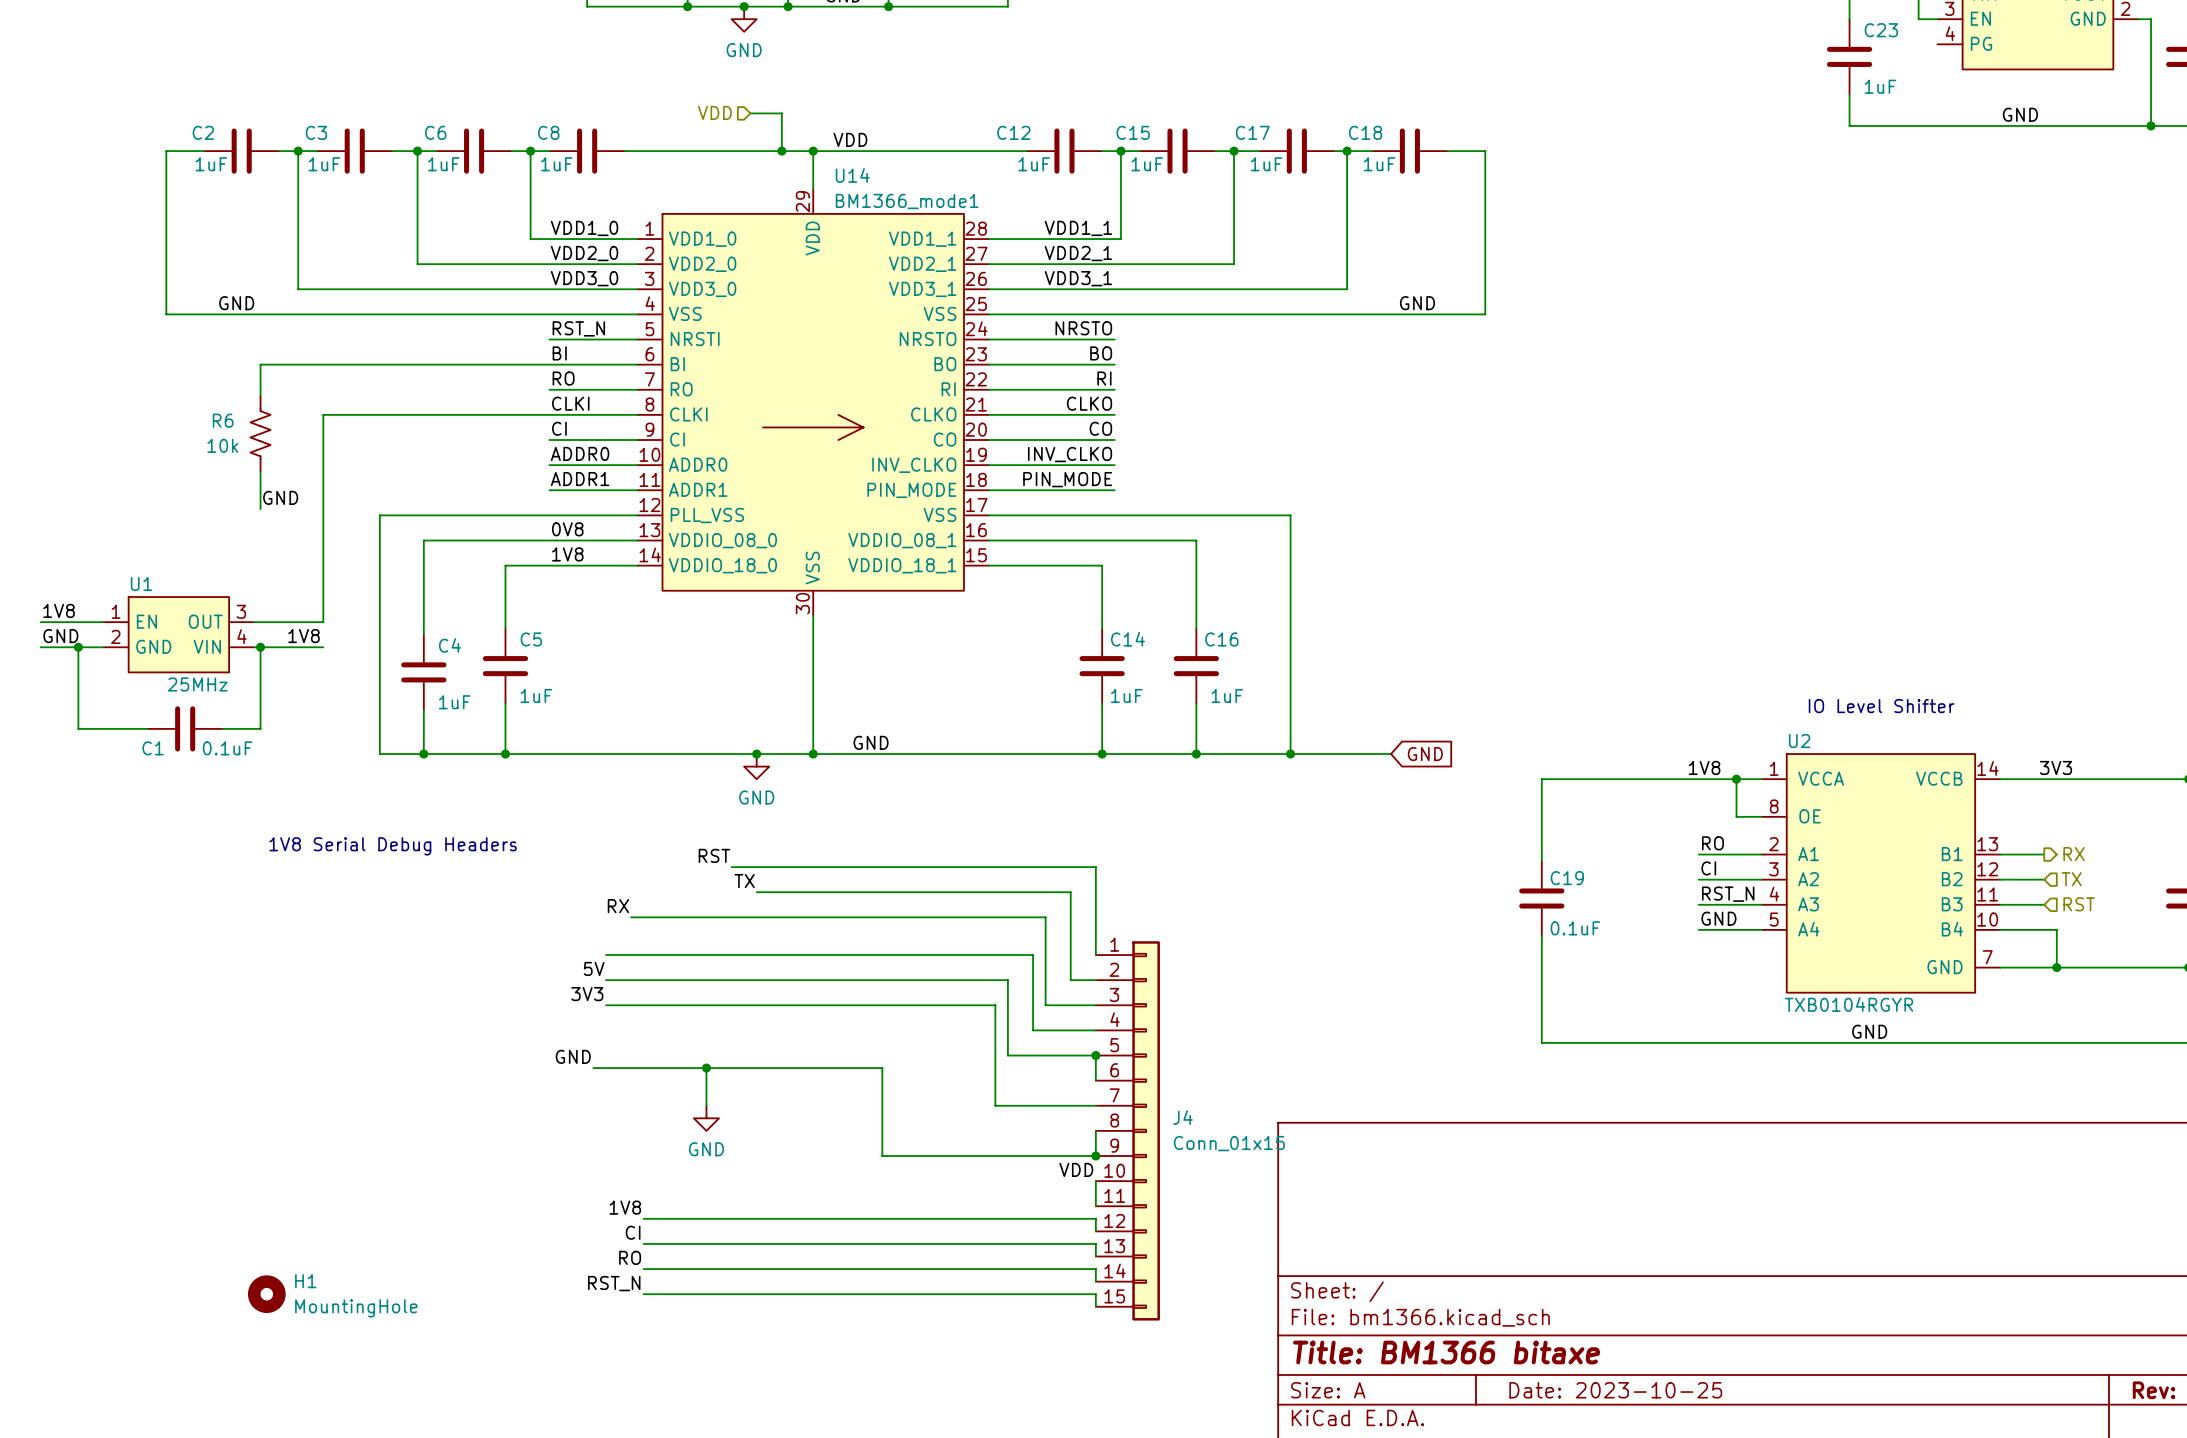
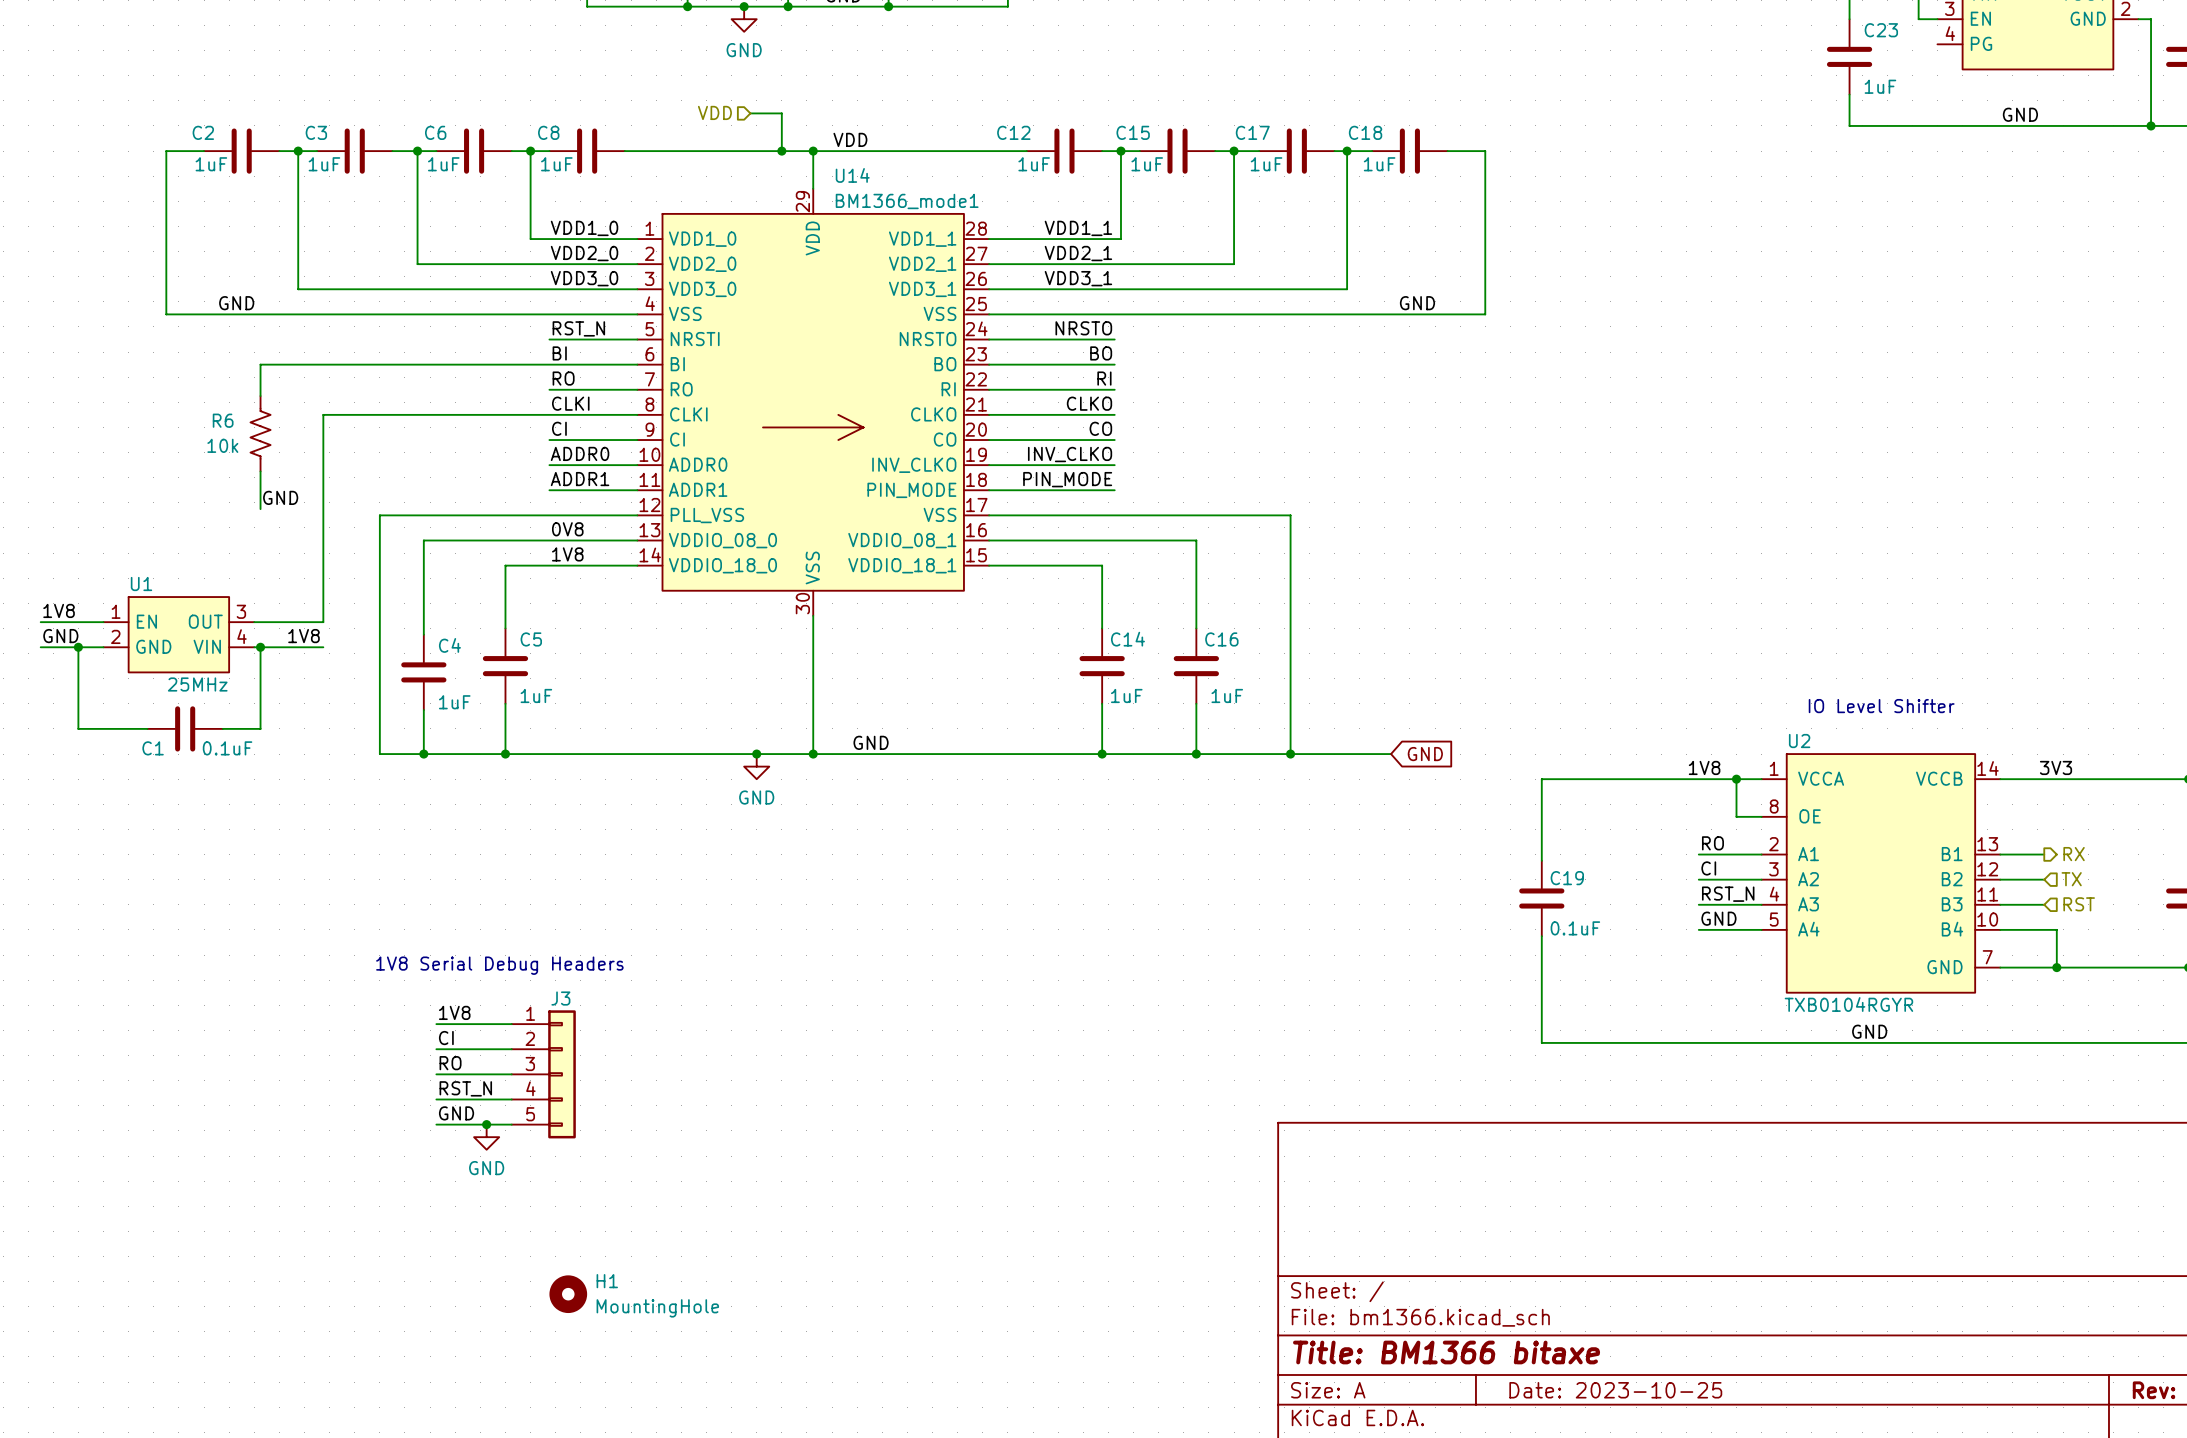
text position: 1V8 Serial Debug Headers (393, 846) -> 1V8 Serial Debug Headers (499, 965)
label: RST (714, 855) -> none
wire: (731, 867) (1095, 867) (1095, 955) -> none
label: TX (744, 881) -> none
wire: (756, 892) (1070, 892) (1070, 980) (1095, 980) -> none
label: RX (618, 906) -> none
wire: (631, 917) (1045, 917) (1045, 1005) (1095, 1005) -> none
wire: (605, 955) (1033, 955) (1033, 1030) (1095, 1030) -> none
label: 5V (594, 968) -> none
wire: (605, 980) (1007, 980) (1007, 1055) (1095, 1055) (1095, 1080) -> none
label: 3V3 (587, 994) -> none
wire: (605, 1005) (995, 1005) (995, 1105) (1095, 1105) -> none
label: none -> 1V8 (454, 1012)
wire: none -> (436, 1024) (511, 1024)
label: none -> CI (446, 1038)
wire: none -> (436, 1049) (511, 1049)
junction: (1095, 1055) -> none
label position: GND (573, 1056) -> GND (456, 1113)
label: none -> RO (450, 1063)
wire: (593, 1068) (882, 1068) (882, 1156) (1095, 1156) (1095, 1130) -> none
wire: (706, 1068) (706, 1105) -> none
junction: (706, 1068) -> none
wire: none -> (436, 1074) (511, 1074)
J3: none -> (543, 1074)
label: none -> RST_N (465, 1088)
wire: none -> (436, 1099) (511, 1099)
power symbol position: GND (706, 1118) -> GND (486, 1137)
wire: none -> (436, 1124) (511, 1124)
junction: none -> (486, 1124)
J4: Conn_01x15 (1127, 1130) -> none
junction: (1095, 1156) -> none
label: VDD (1076, 1169) -> none
wire: (1095, 1181) (1095, 1206) -> none
label: 1V8 (625, 1207) -> none
wire: (643, 1218) (1095, 1218) (1095, 1231) -> none
label: CI (633, 1232) -> none
wire: (643, 1243) (1095, 1243) (1095, 1256) -> none
label: RO (630, 1257) -> none
wire: (643, 1269) (1095, 1269) (1095, 1281) -> none
label: RST_N (614, 1283) -> none
H1 position: (266, 1294) -> (568, 1294)
wire: (643, 1294) (1095, 1294) (1095, 1306) -> none

